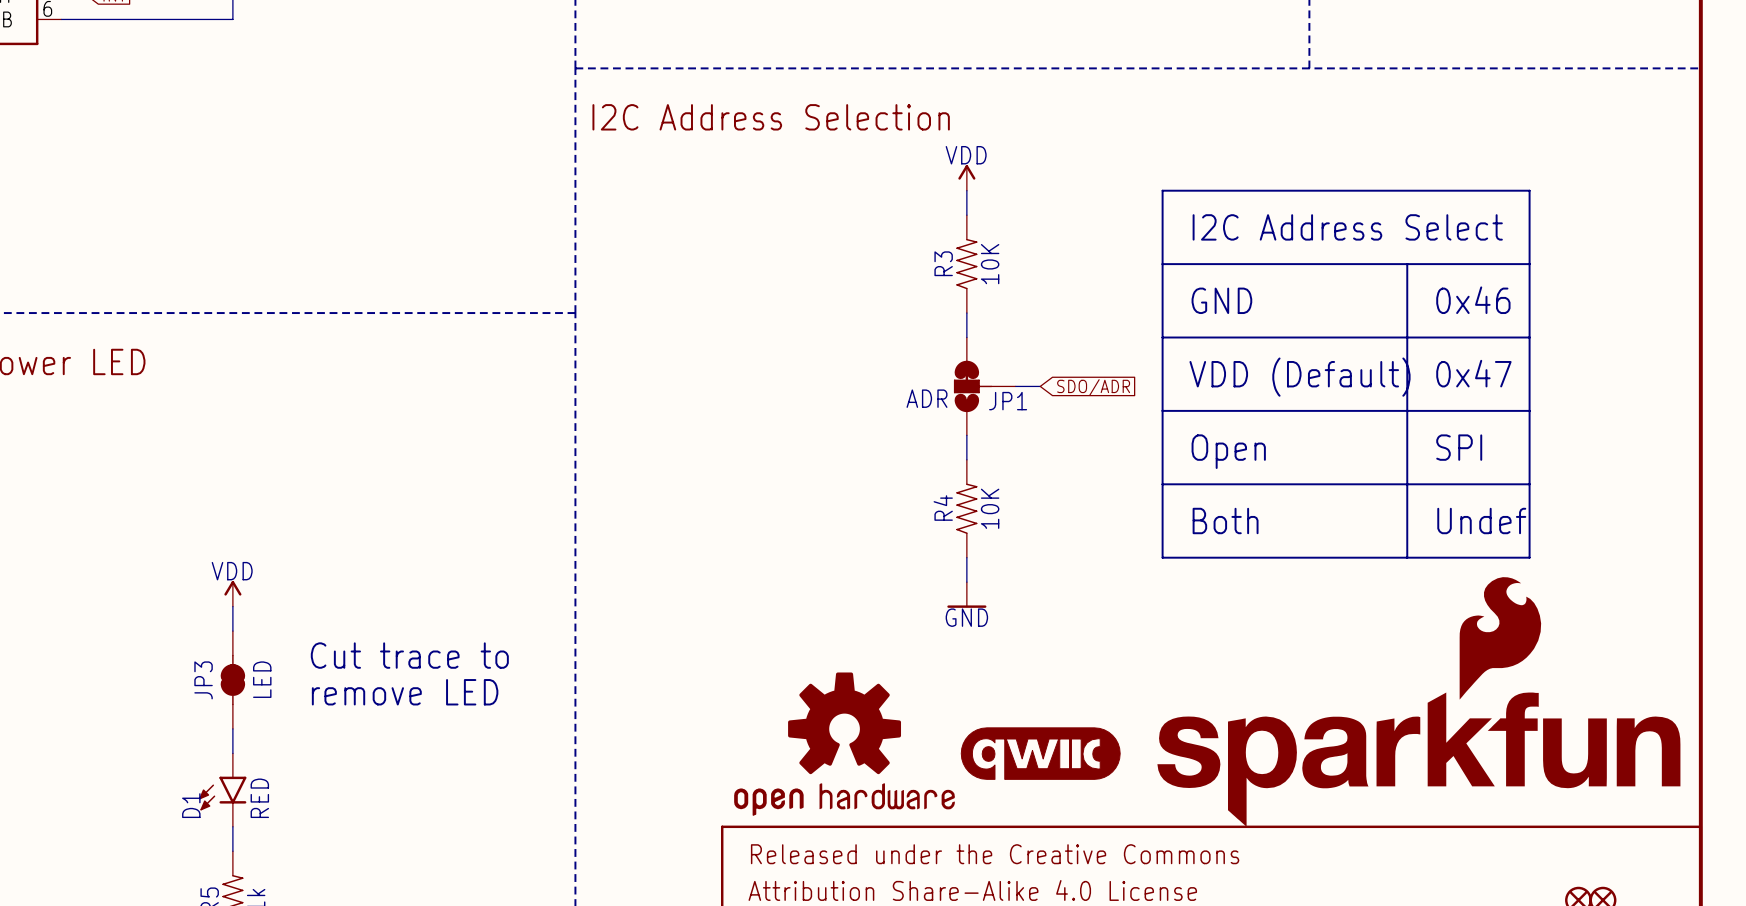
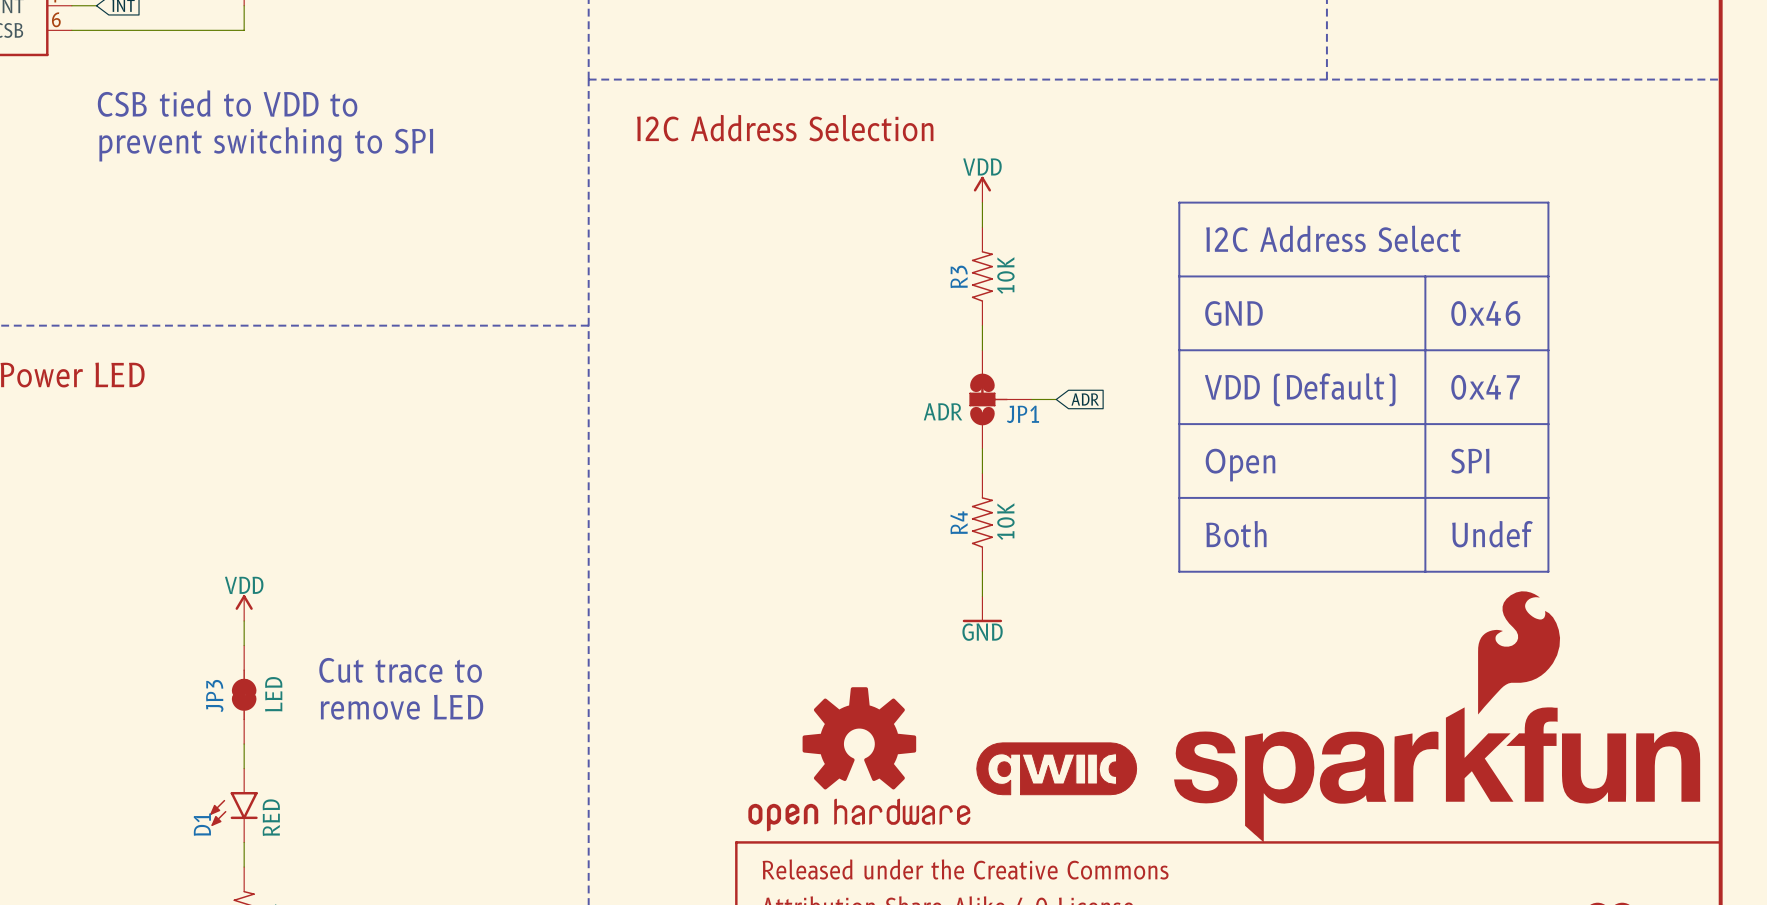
text: none -> CSB tied to VDD to (227, 103)
text: none -> prevent switching to SPI (266, 144)
global label: SDO/ADR (1093, 387) -> ADR (1085, 399)

